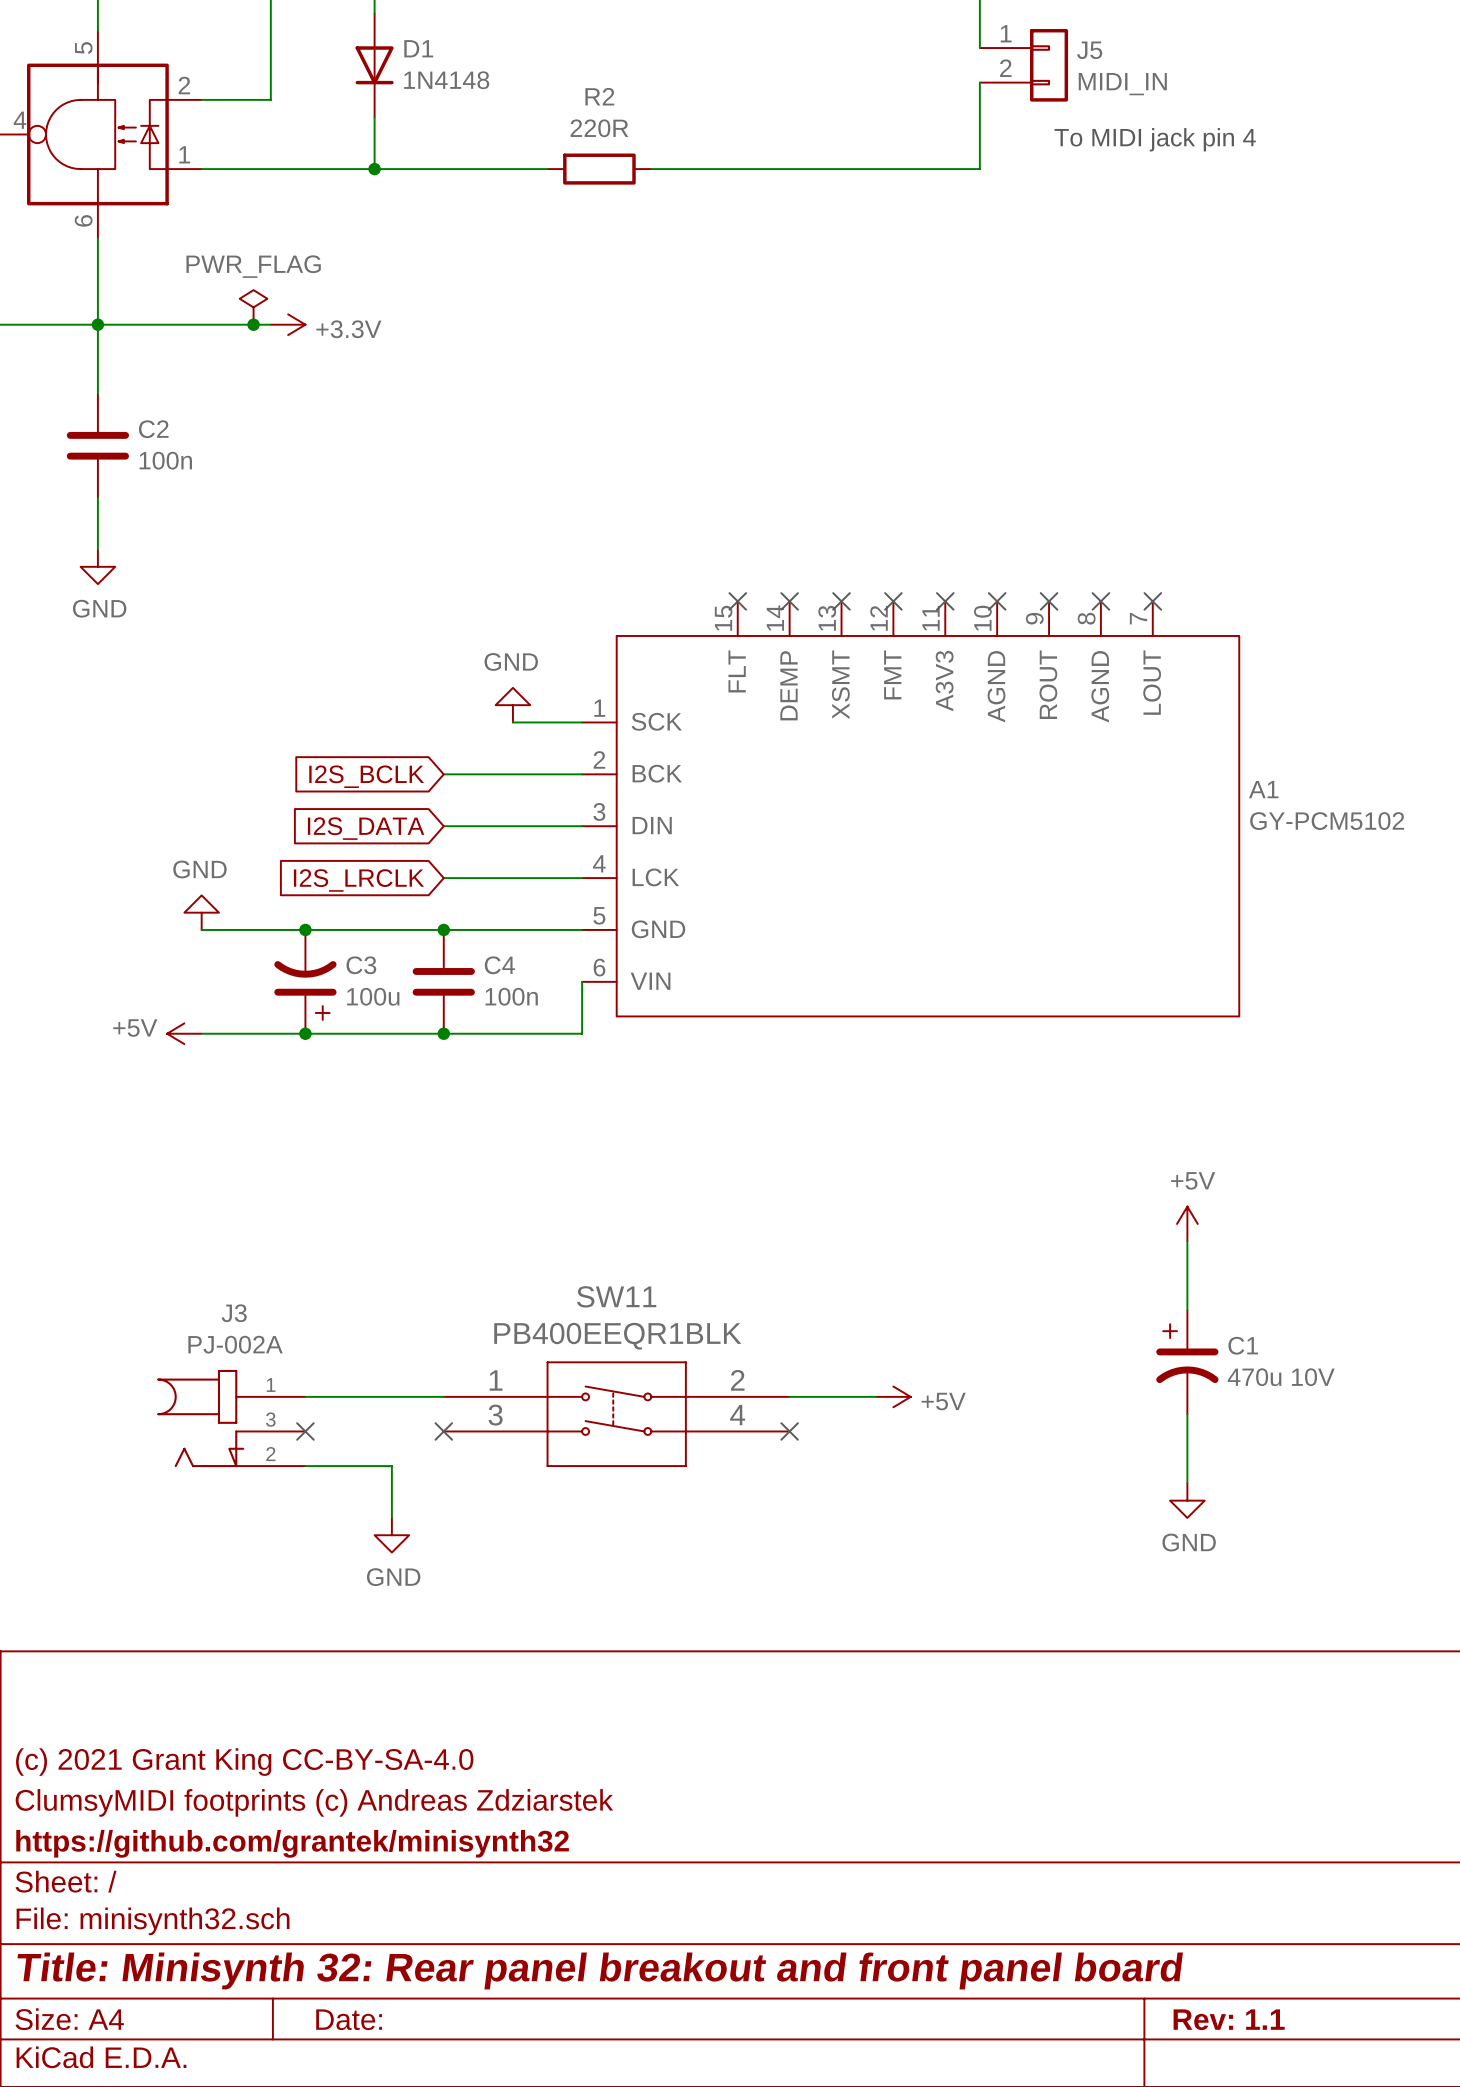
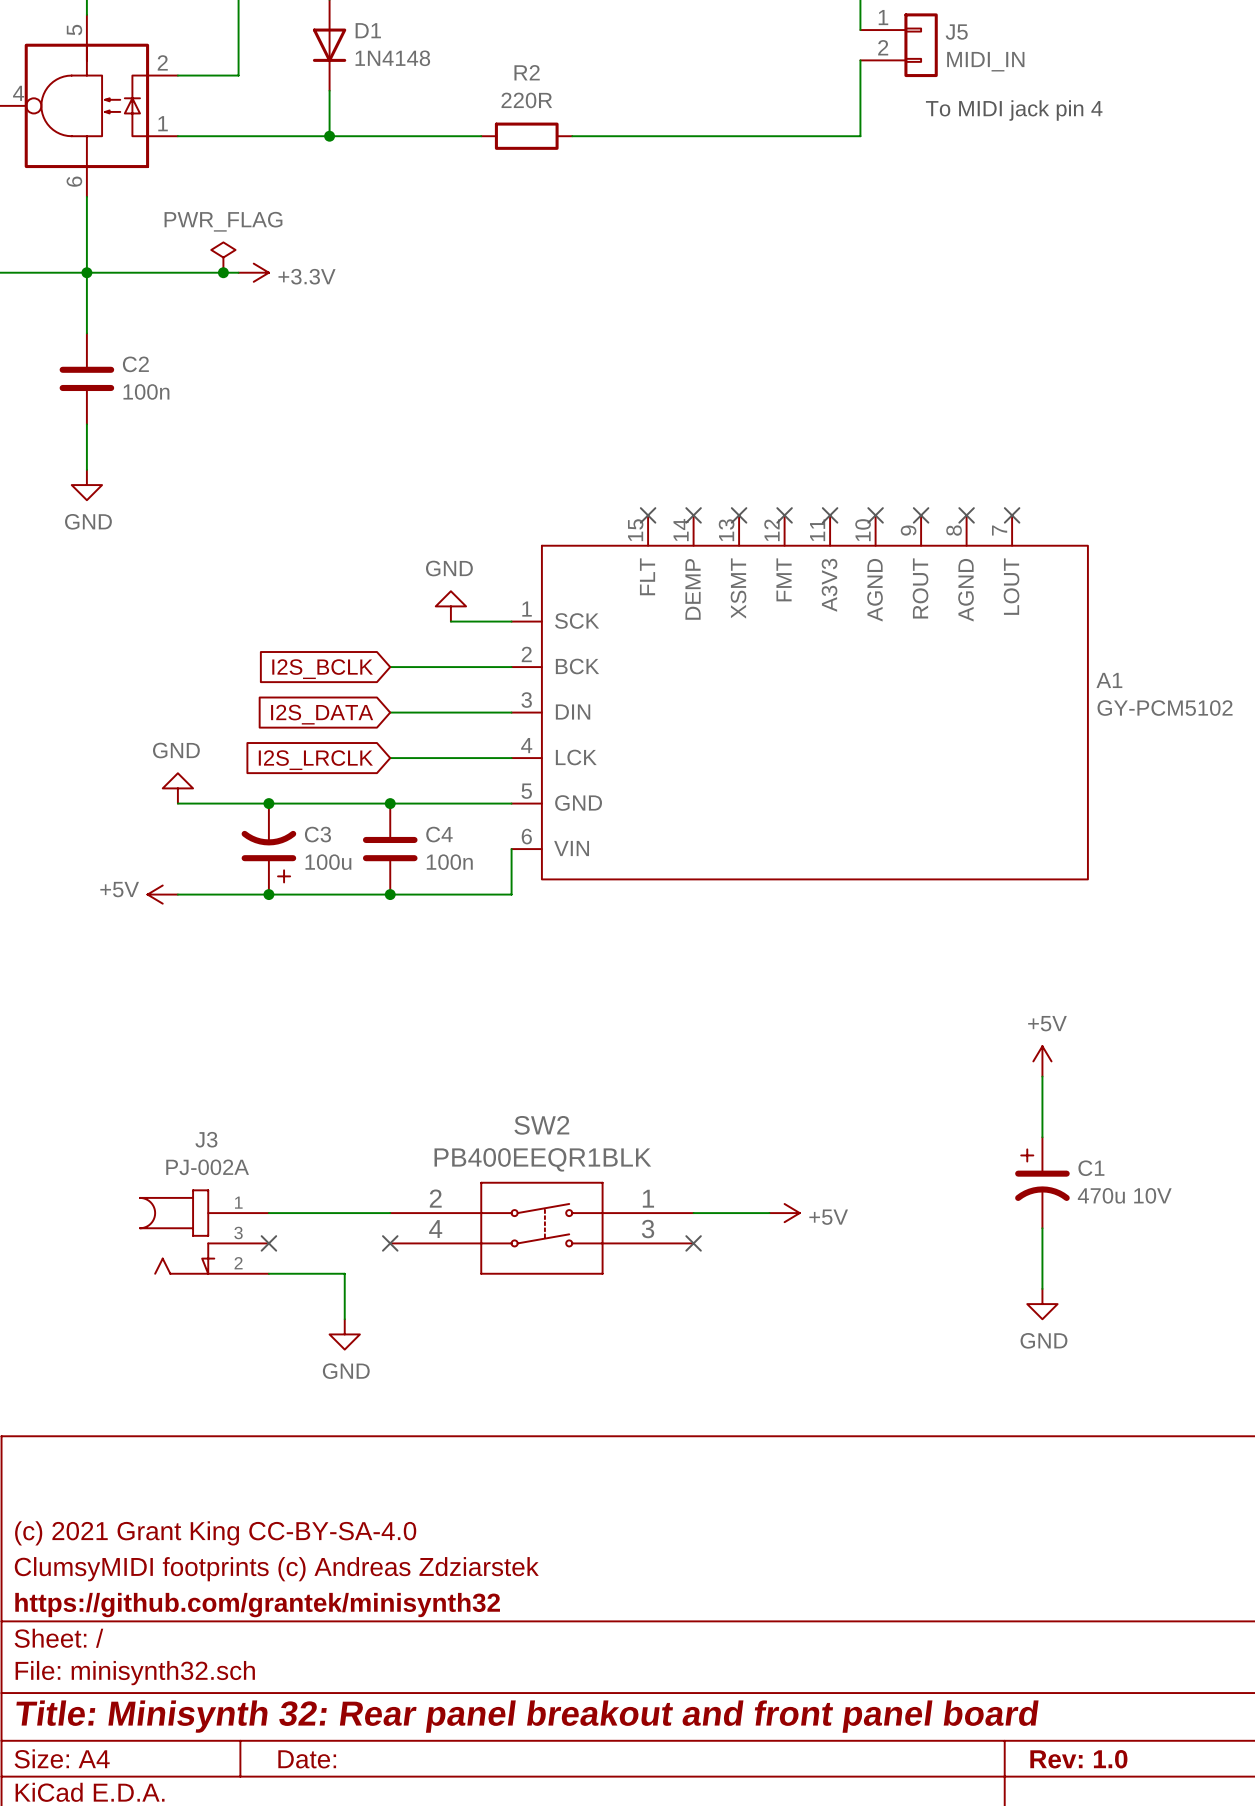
SW11: PB400EEQR1BLK (616, 1414) -> none
SW2: none -> PB400EEQR1BLK (541, 1228)
title block: Rev: 1.1 (1229, 2019) -> Rev: 1.0 (1078, 1759)

